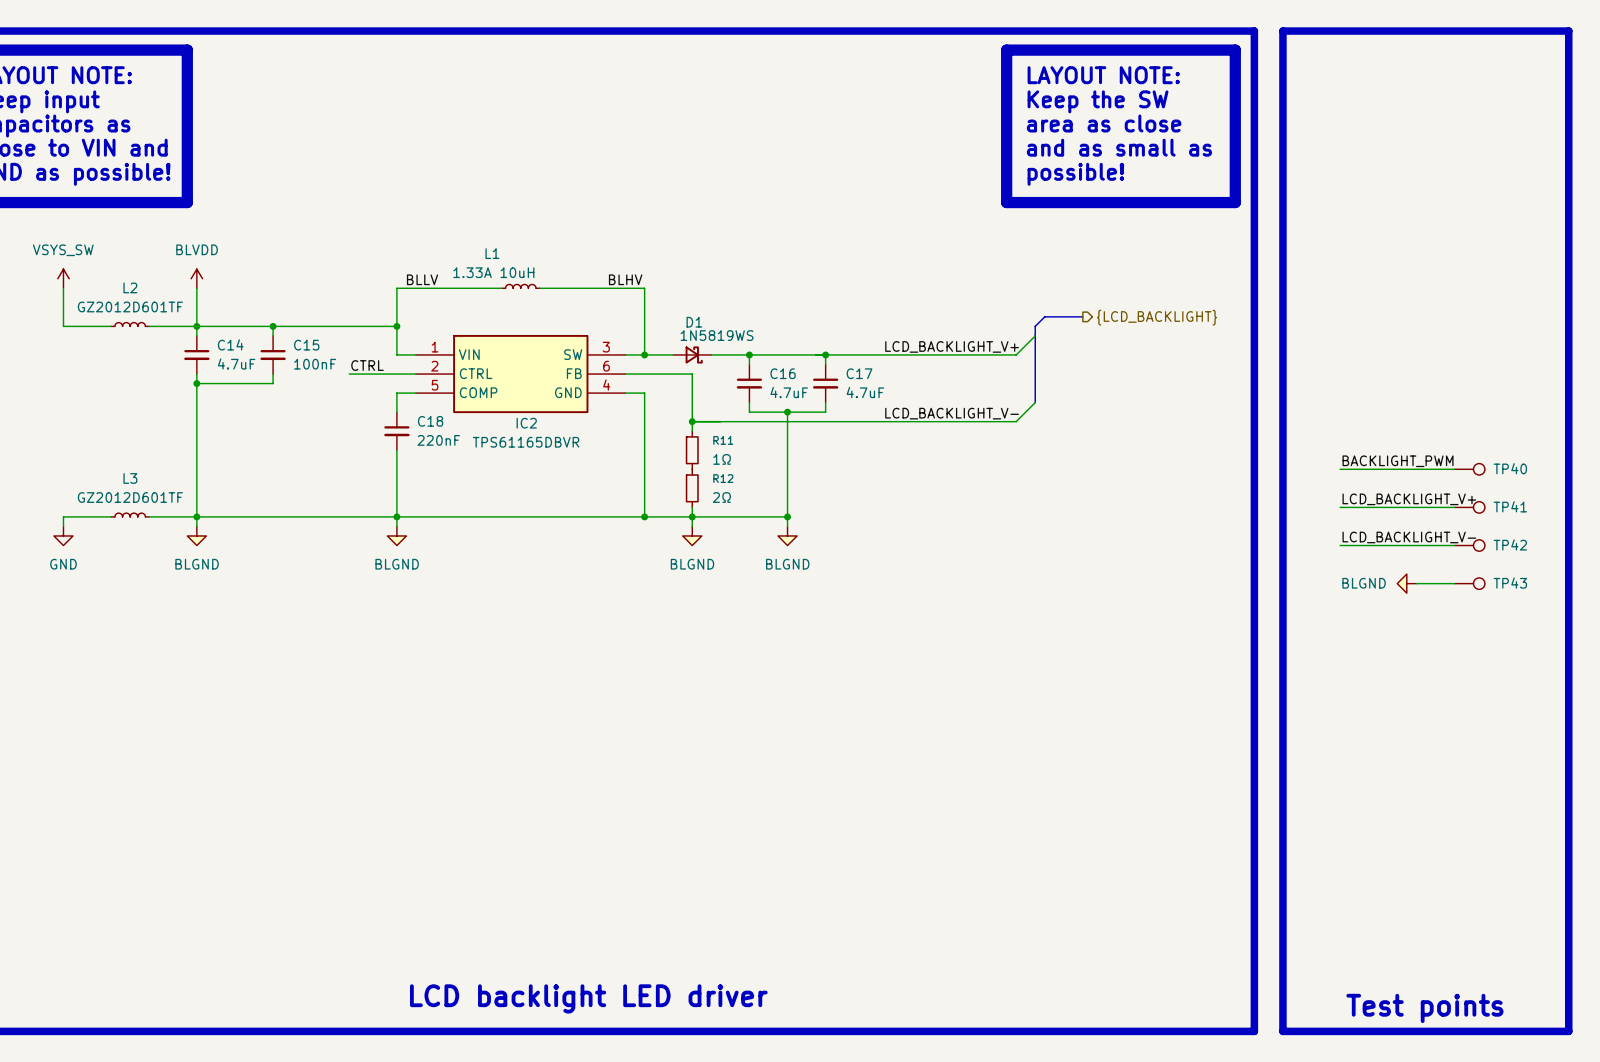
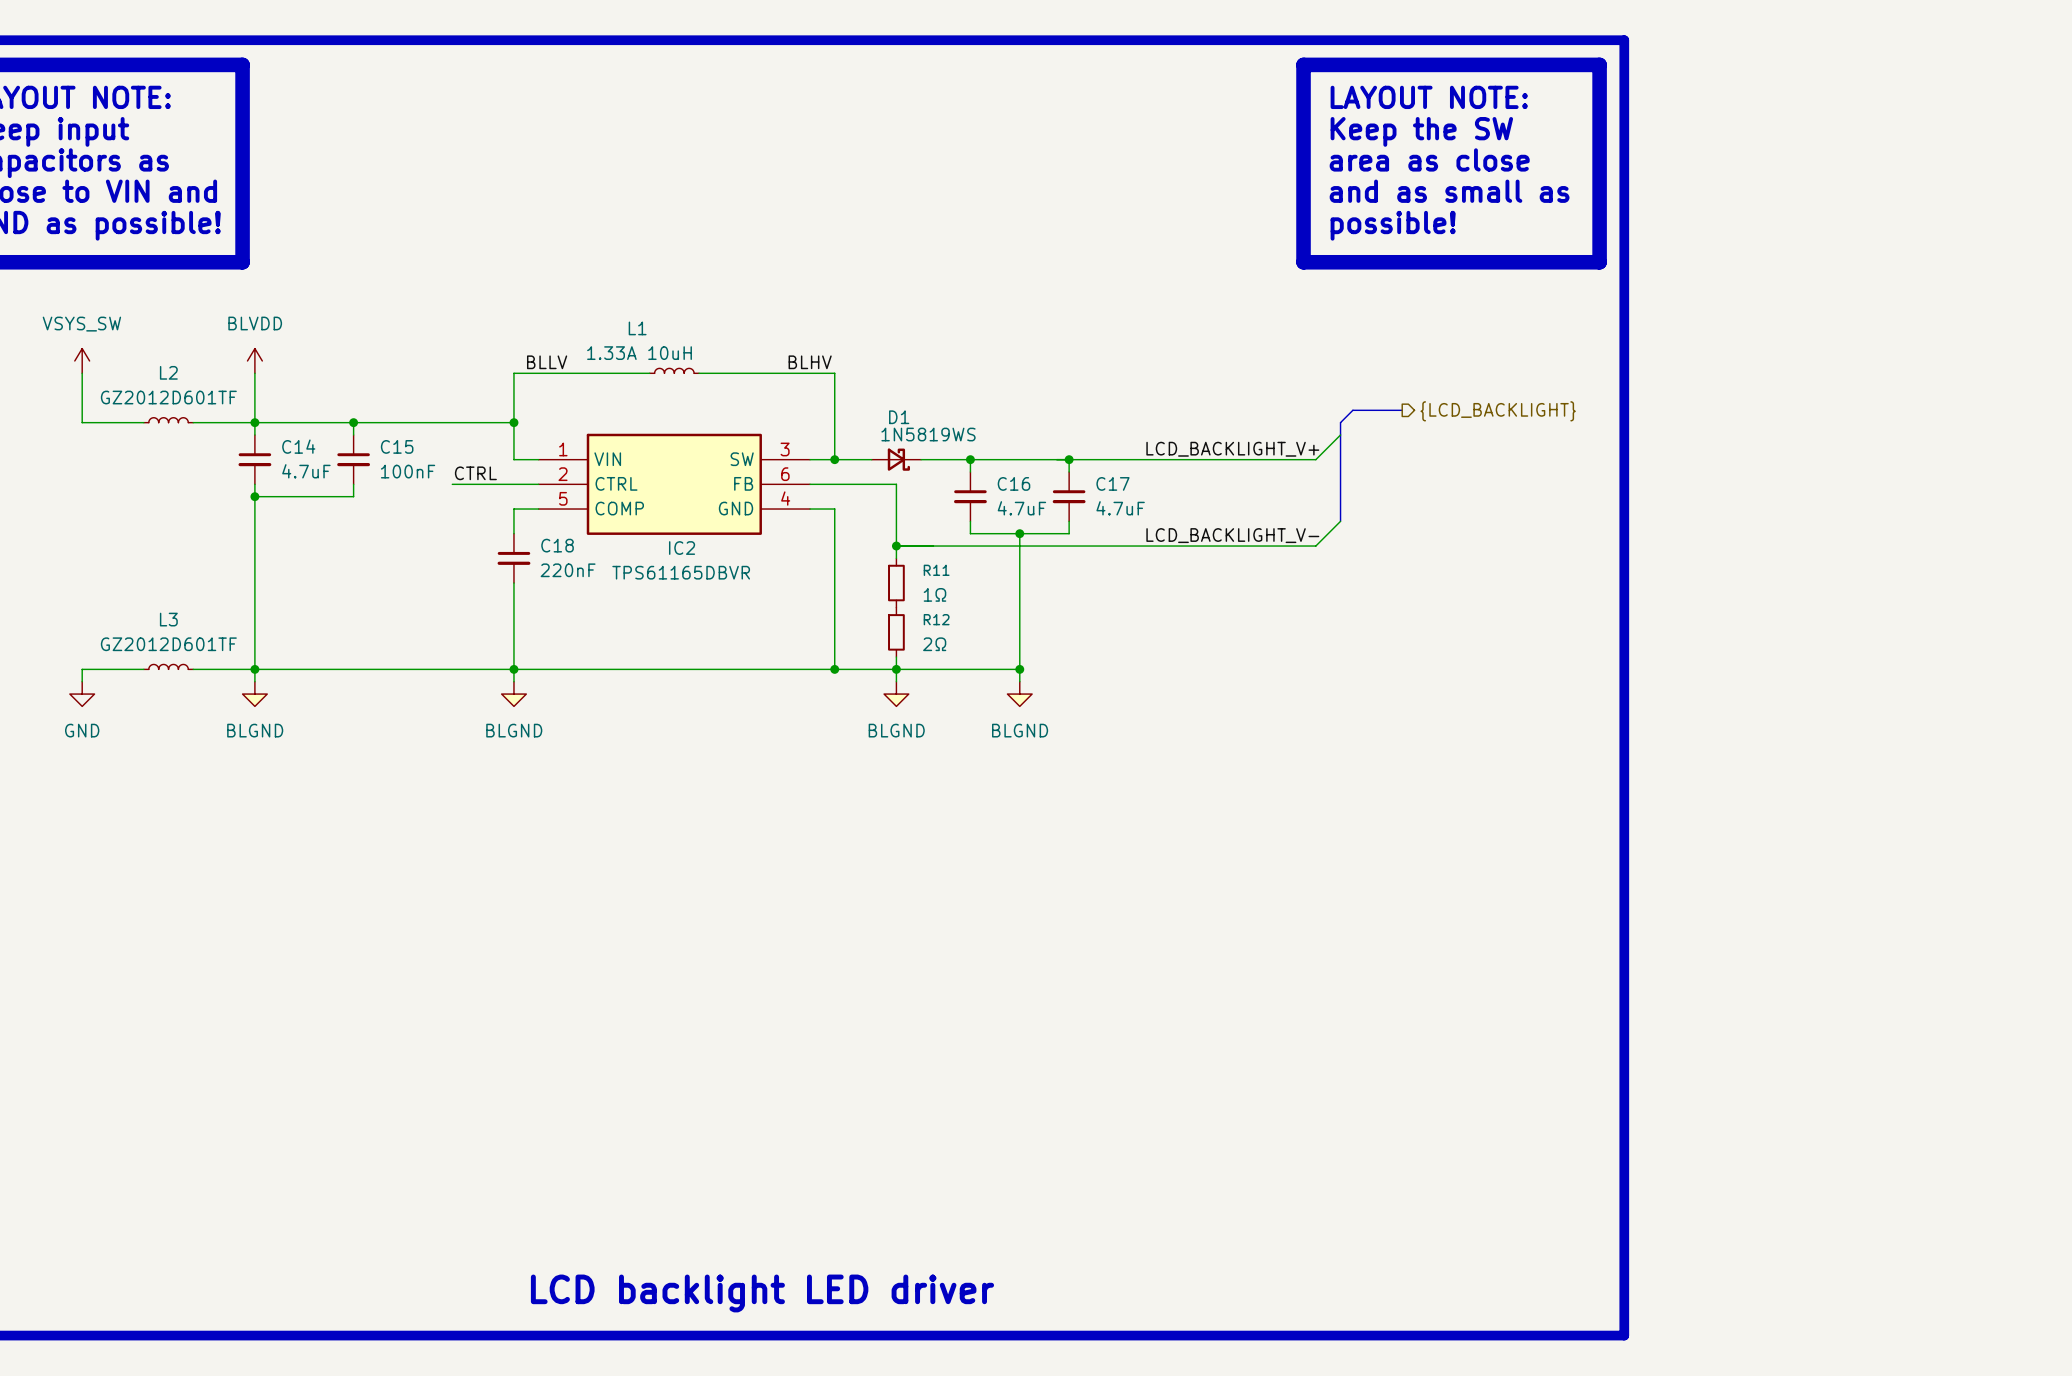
line: (1282, 31) (1568, 31) (1568, 1031) (1282, 1031) (1282, 31) -> none
label: BACKLIGHT_PWM (1398, 461) -> none
wire: (1340, 469) (1454, 469) -> none
TP40: (1469, 469) -> none
label: LCD_BACKLIGHT_V+ (1409, 499) -> none
wire: (1340, 507) (1454, 507) -> none
TP41: (1469, 507) -> none
label: LCD_BACKLIGHT_V- (1409, 537) -> none
wire: (1340, 545) (1454, 545) -> none
TP42: (1469, 545) -> none
power symbol: BLGND (1406, 583) -> none
wire: (1416, 583) (1454, 583) -> none
TP43: (1469, 583) -> none
text: Test points (1424, 1008) -> none

